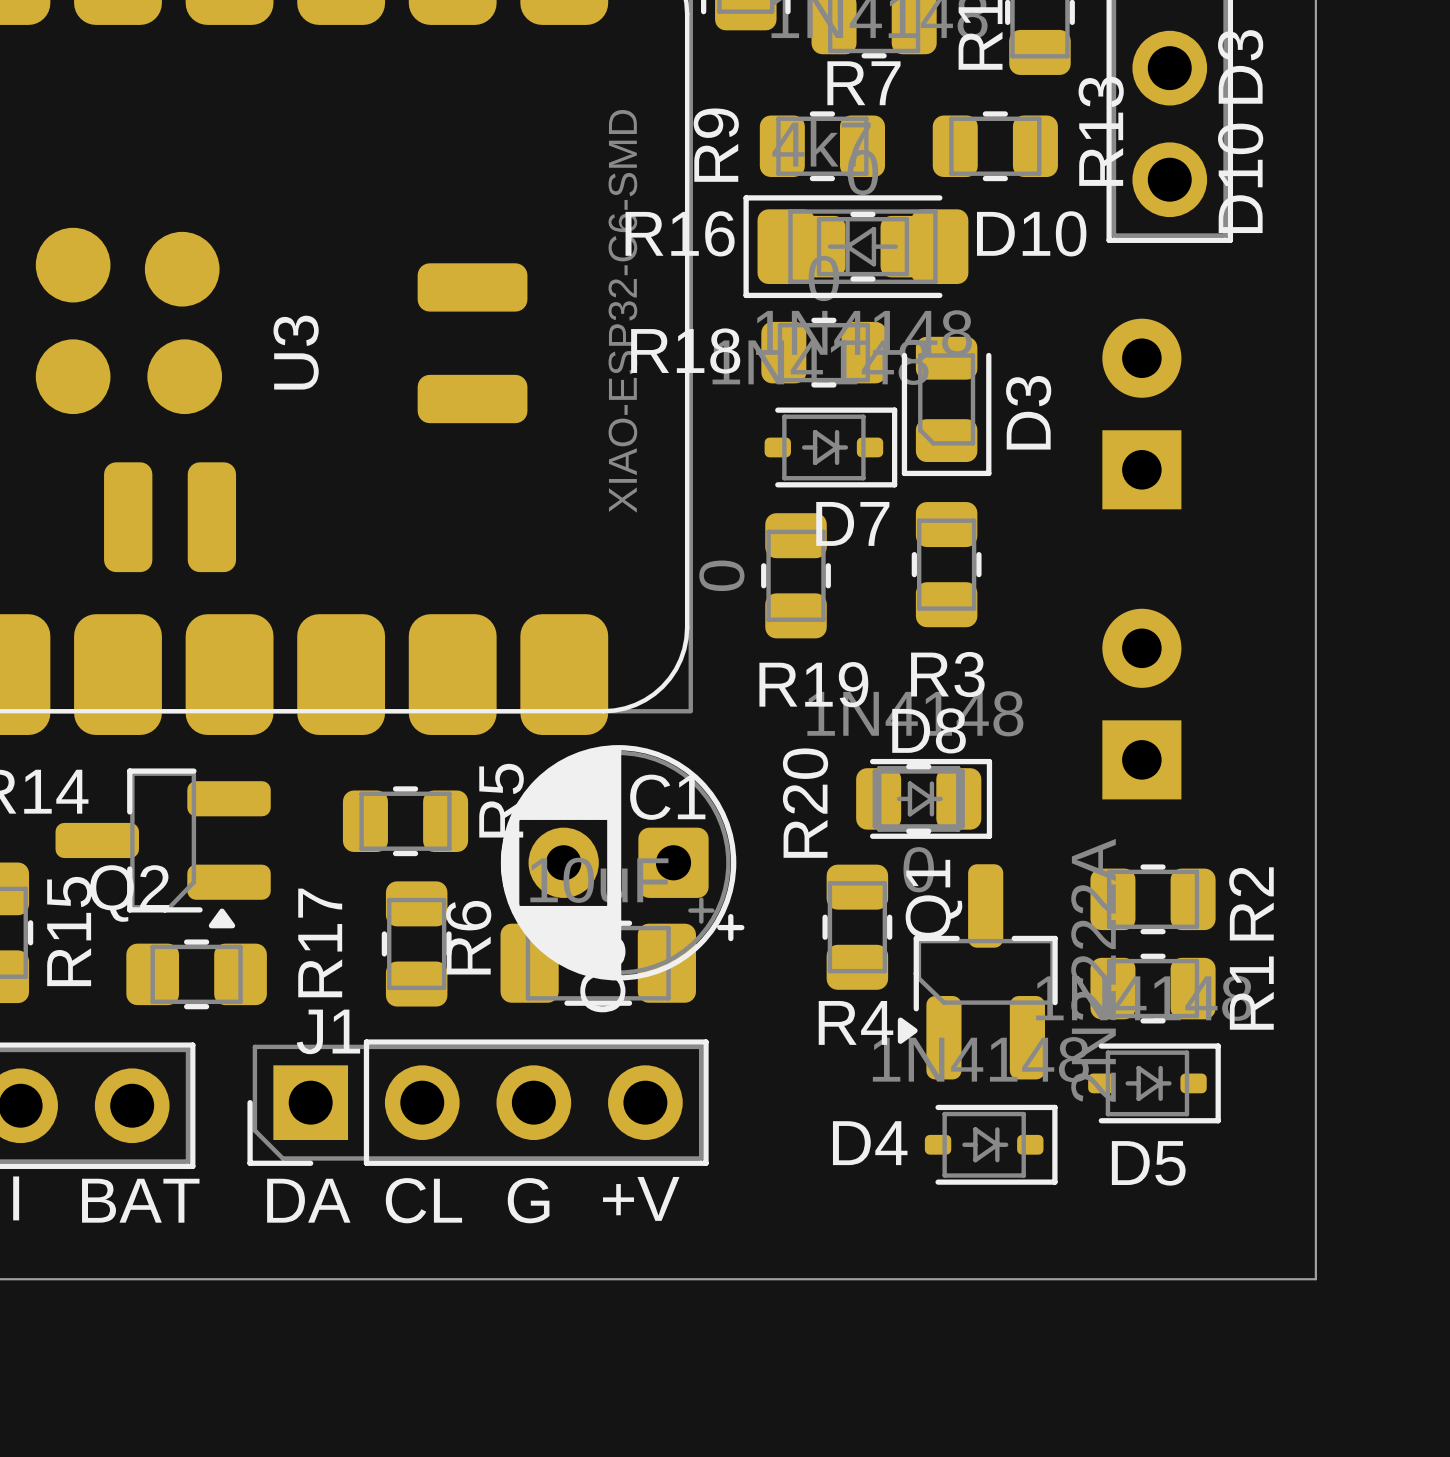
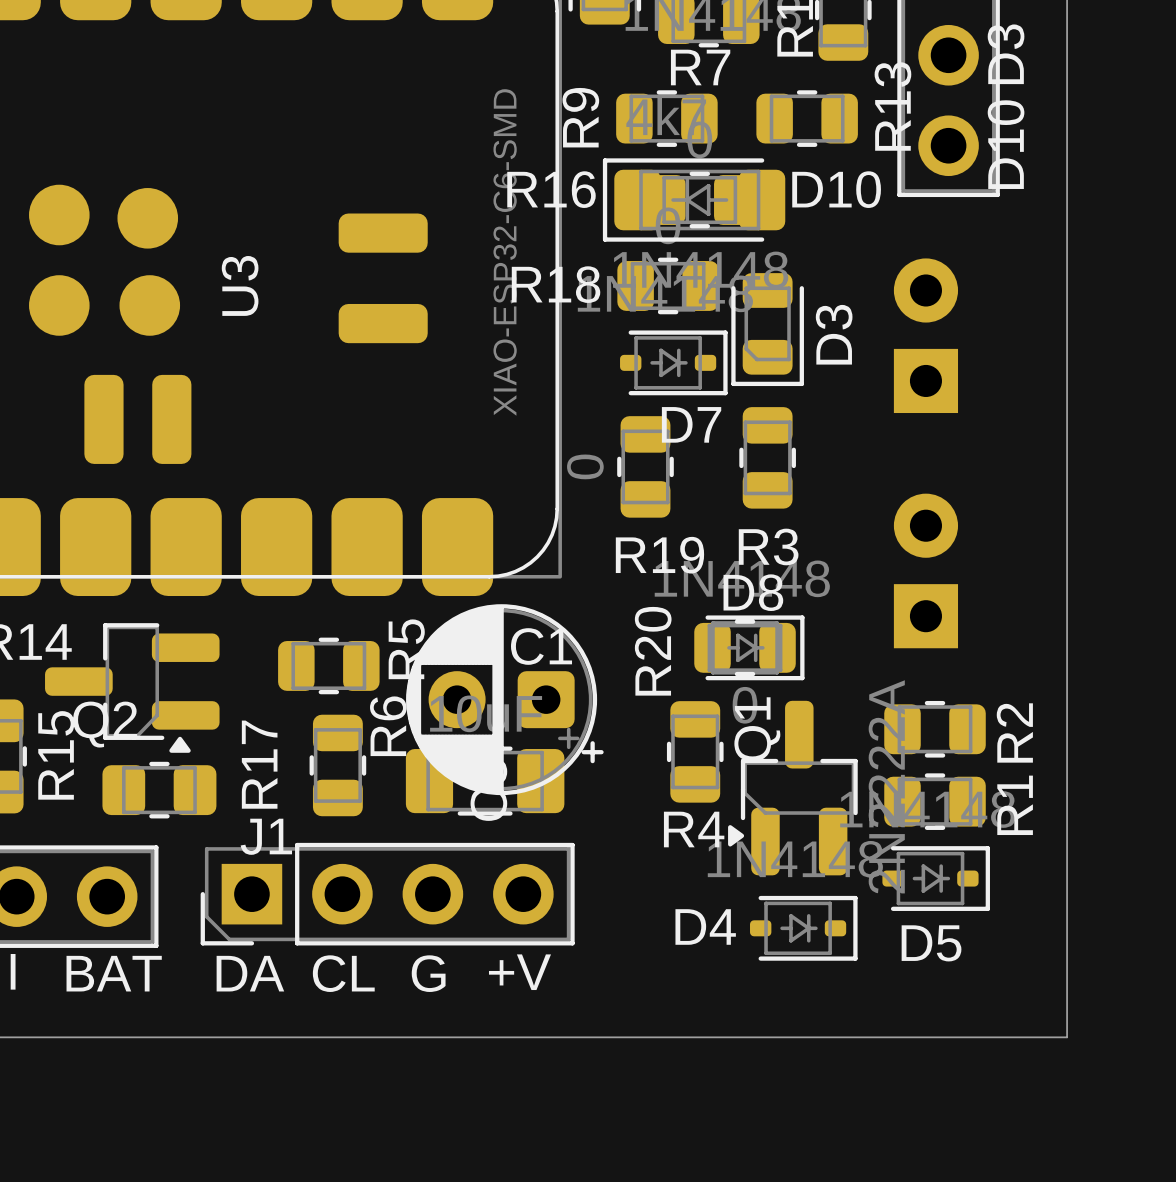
R6 name position: R6 (468, 937) -> R6 (388, 726)

